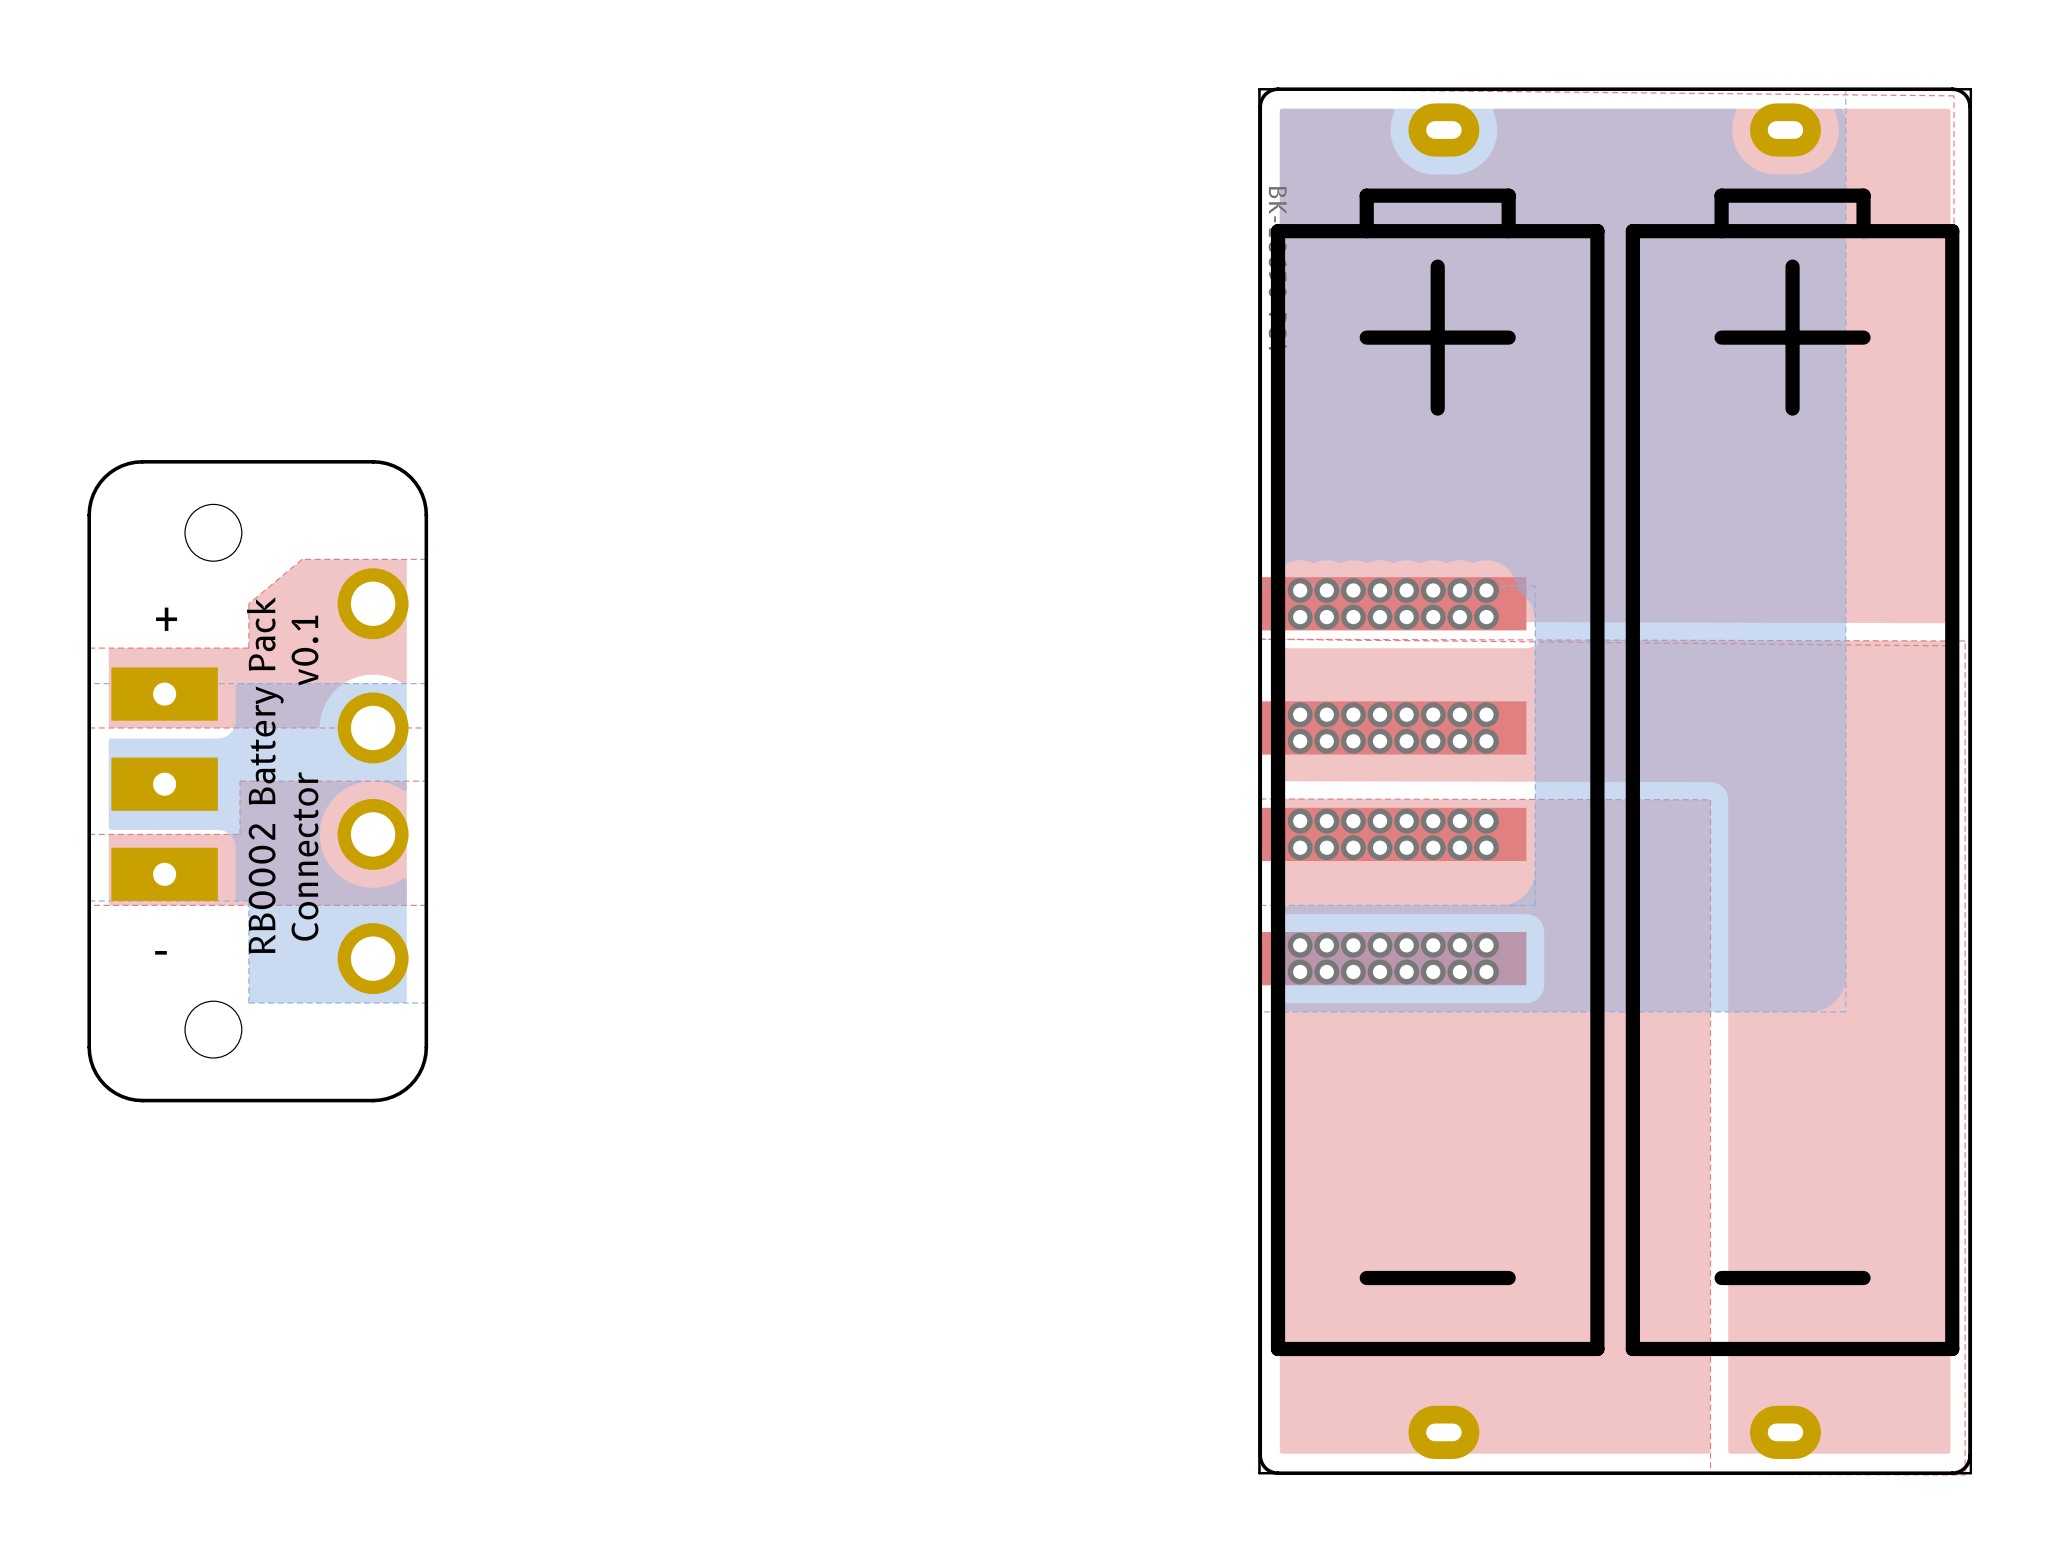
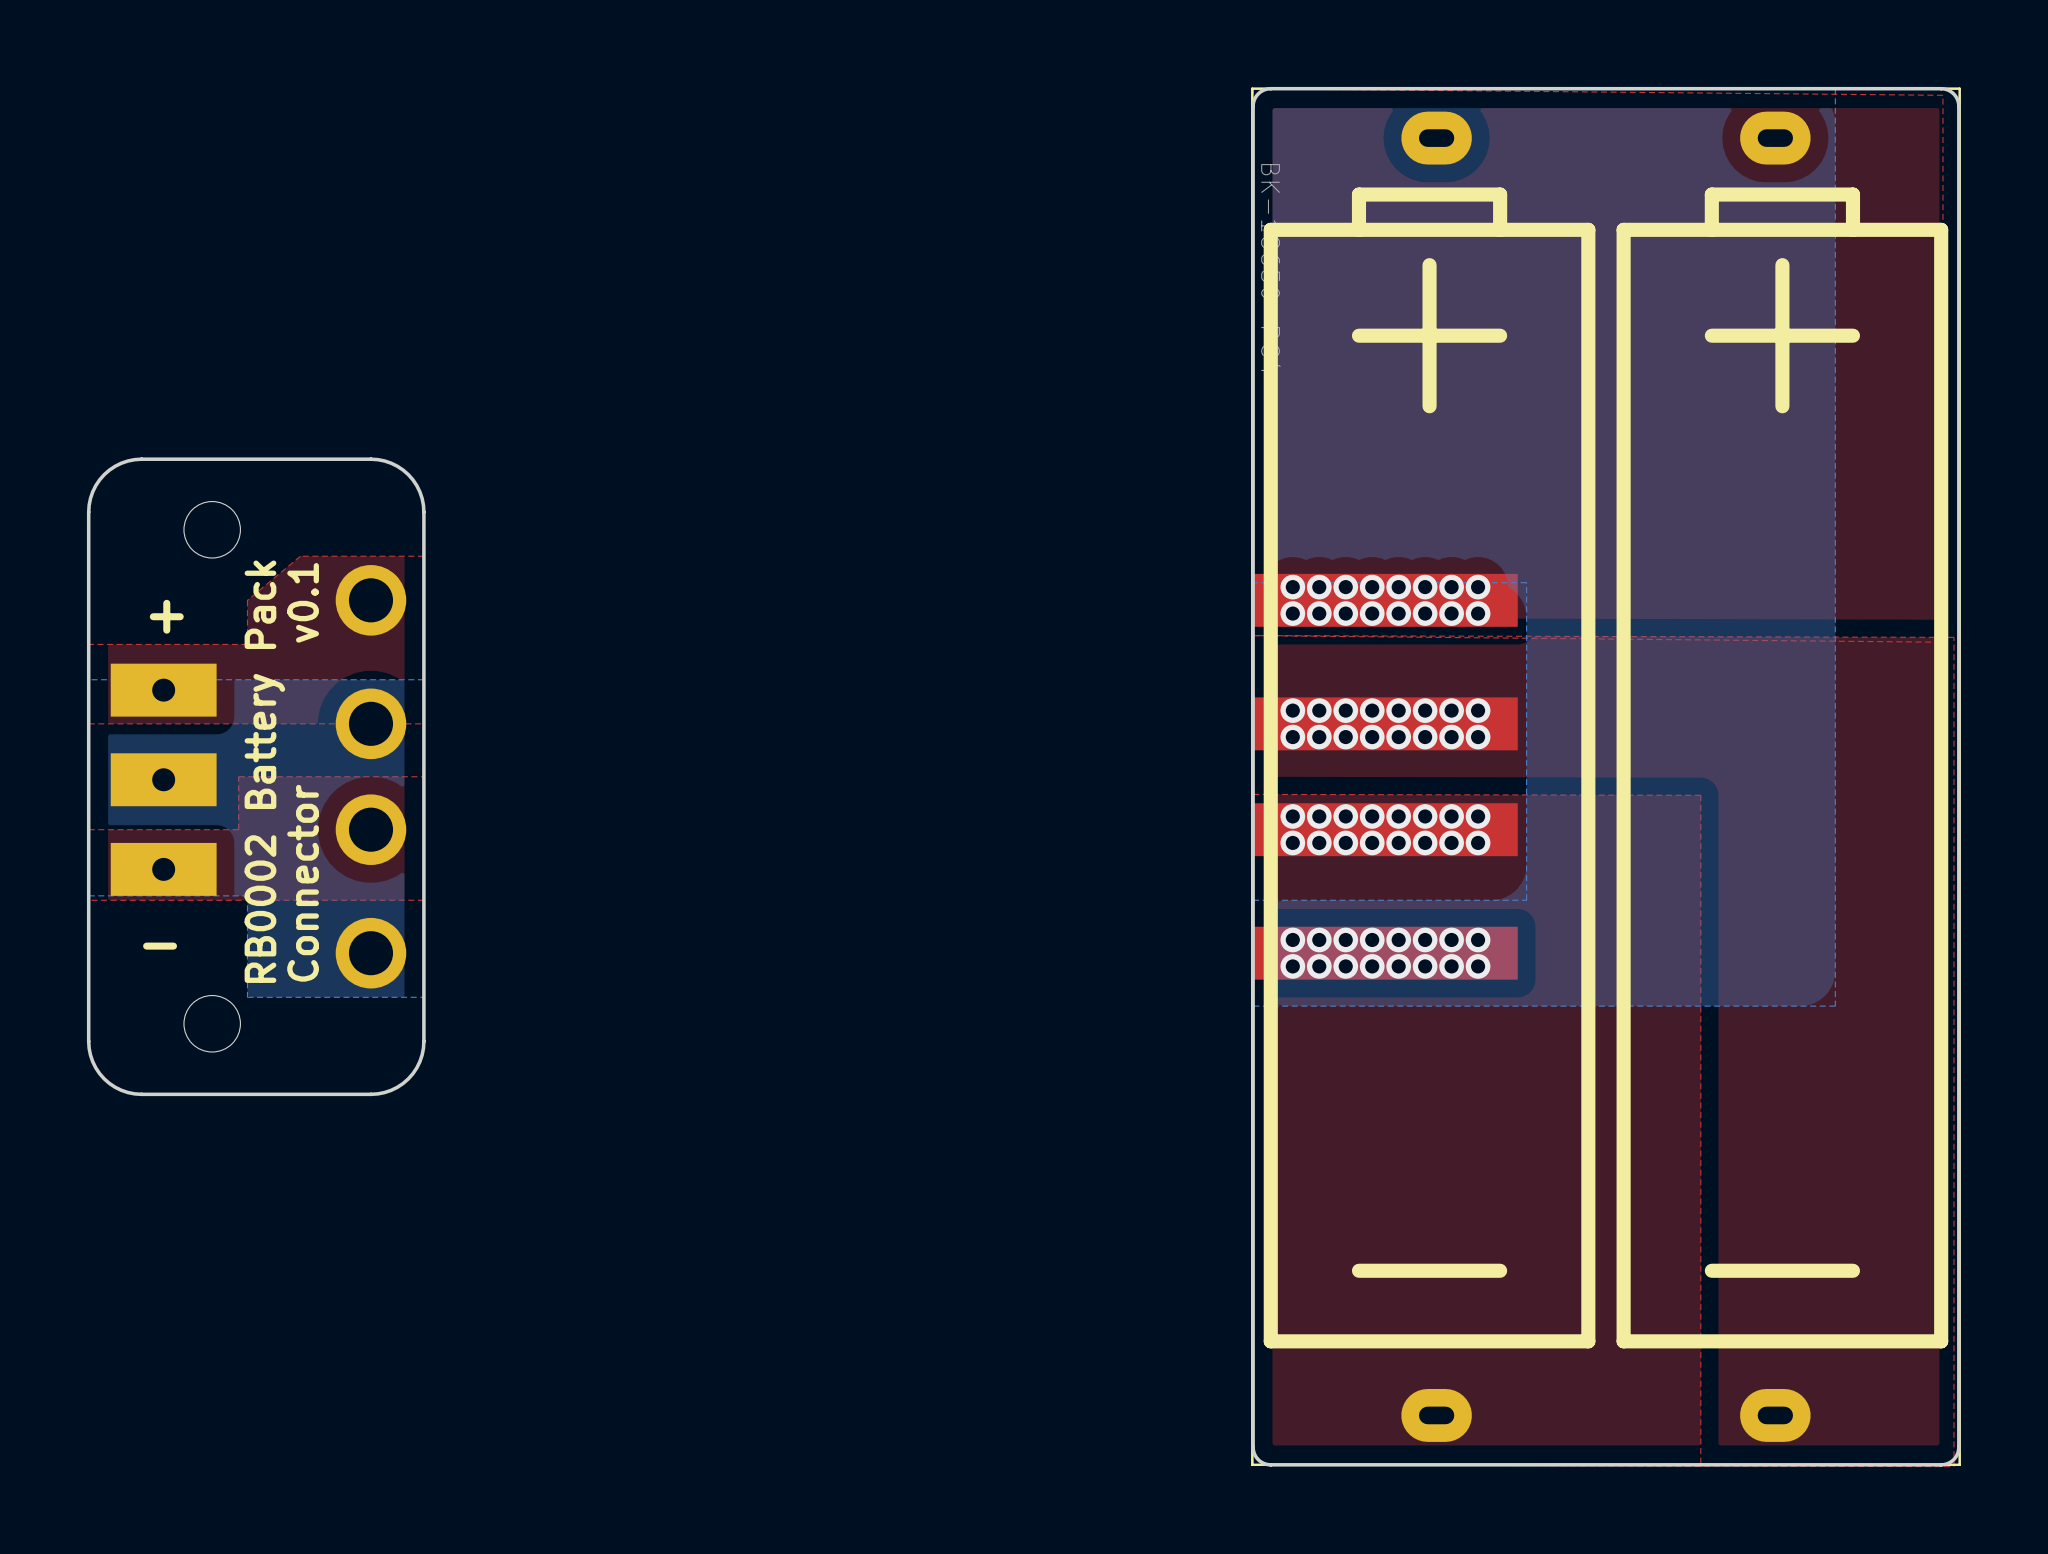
part footprint: [1258, 88, 1973, 1475] -> [1251, 87, 1961, 1466]

